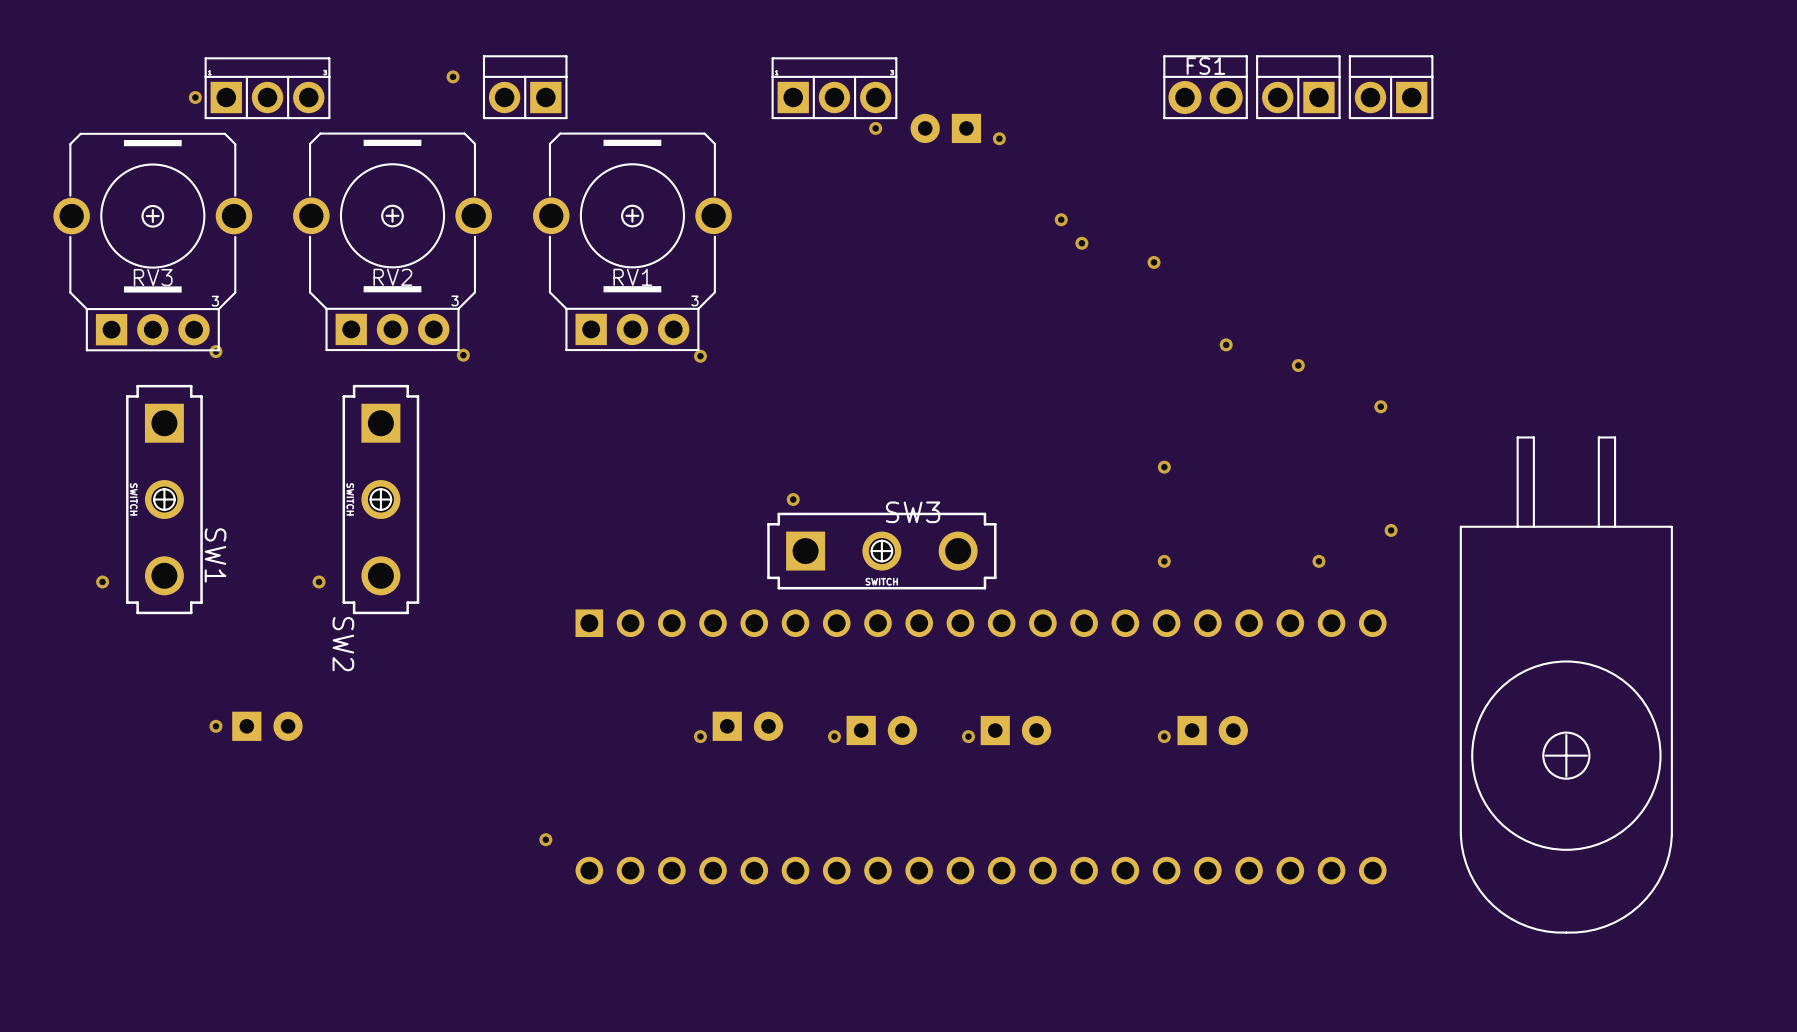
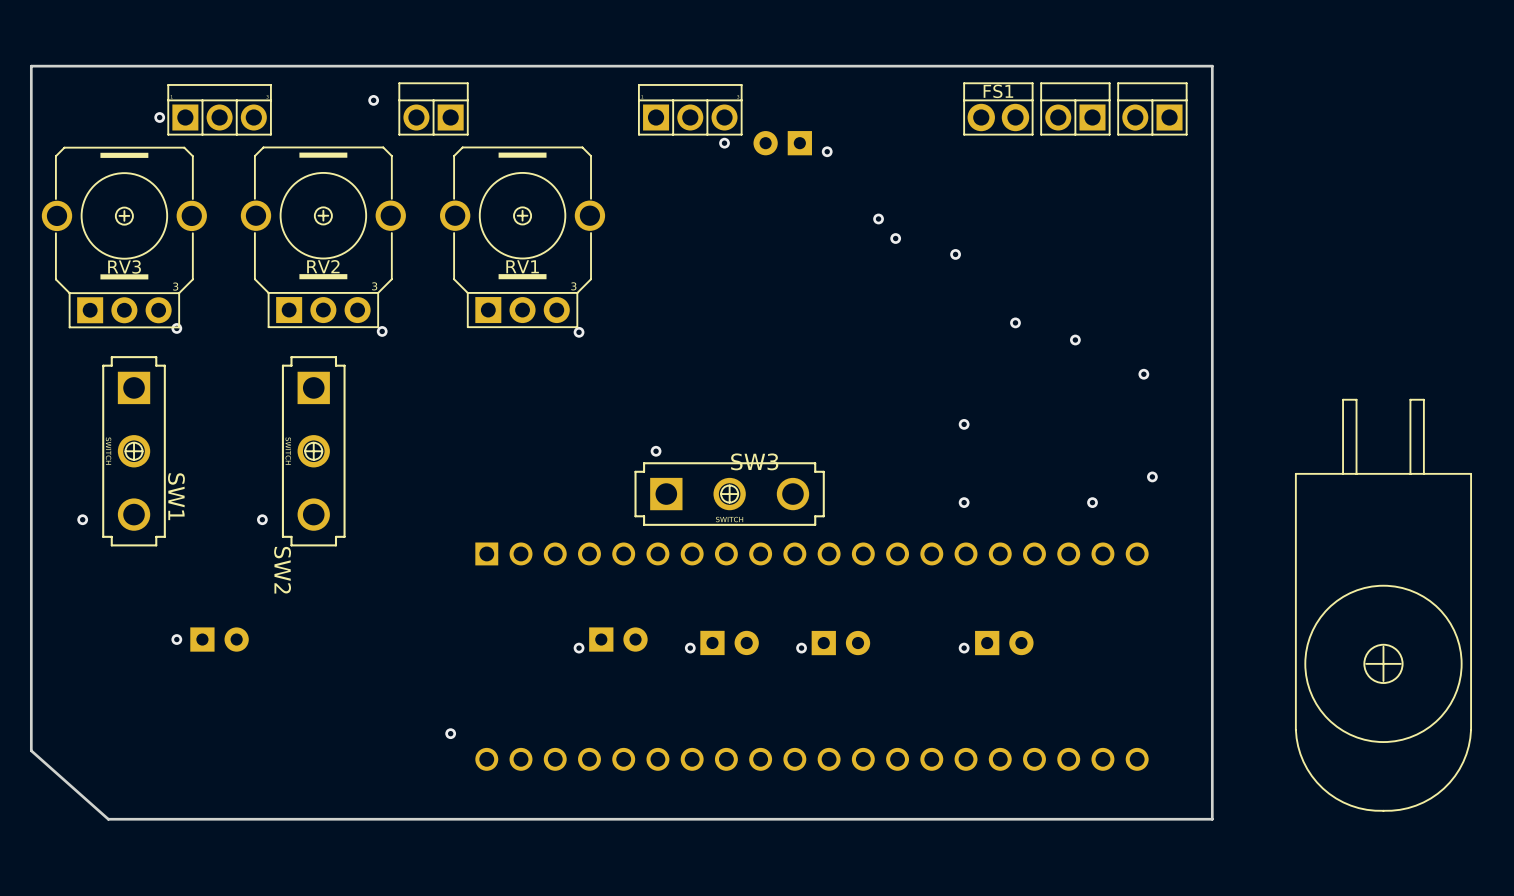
board edge: none -> (1212, 66) (1212, 819) (108, 819) (31, 750) (31, 66) (1212, 66)
drawing position: (1566, 685) -> (1383, 605)

